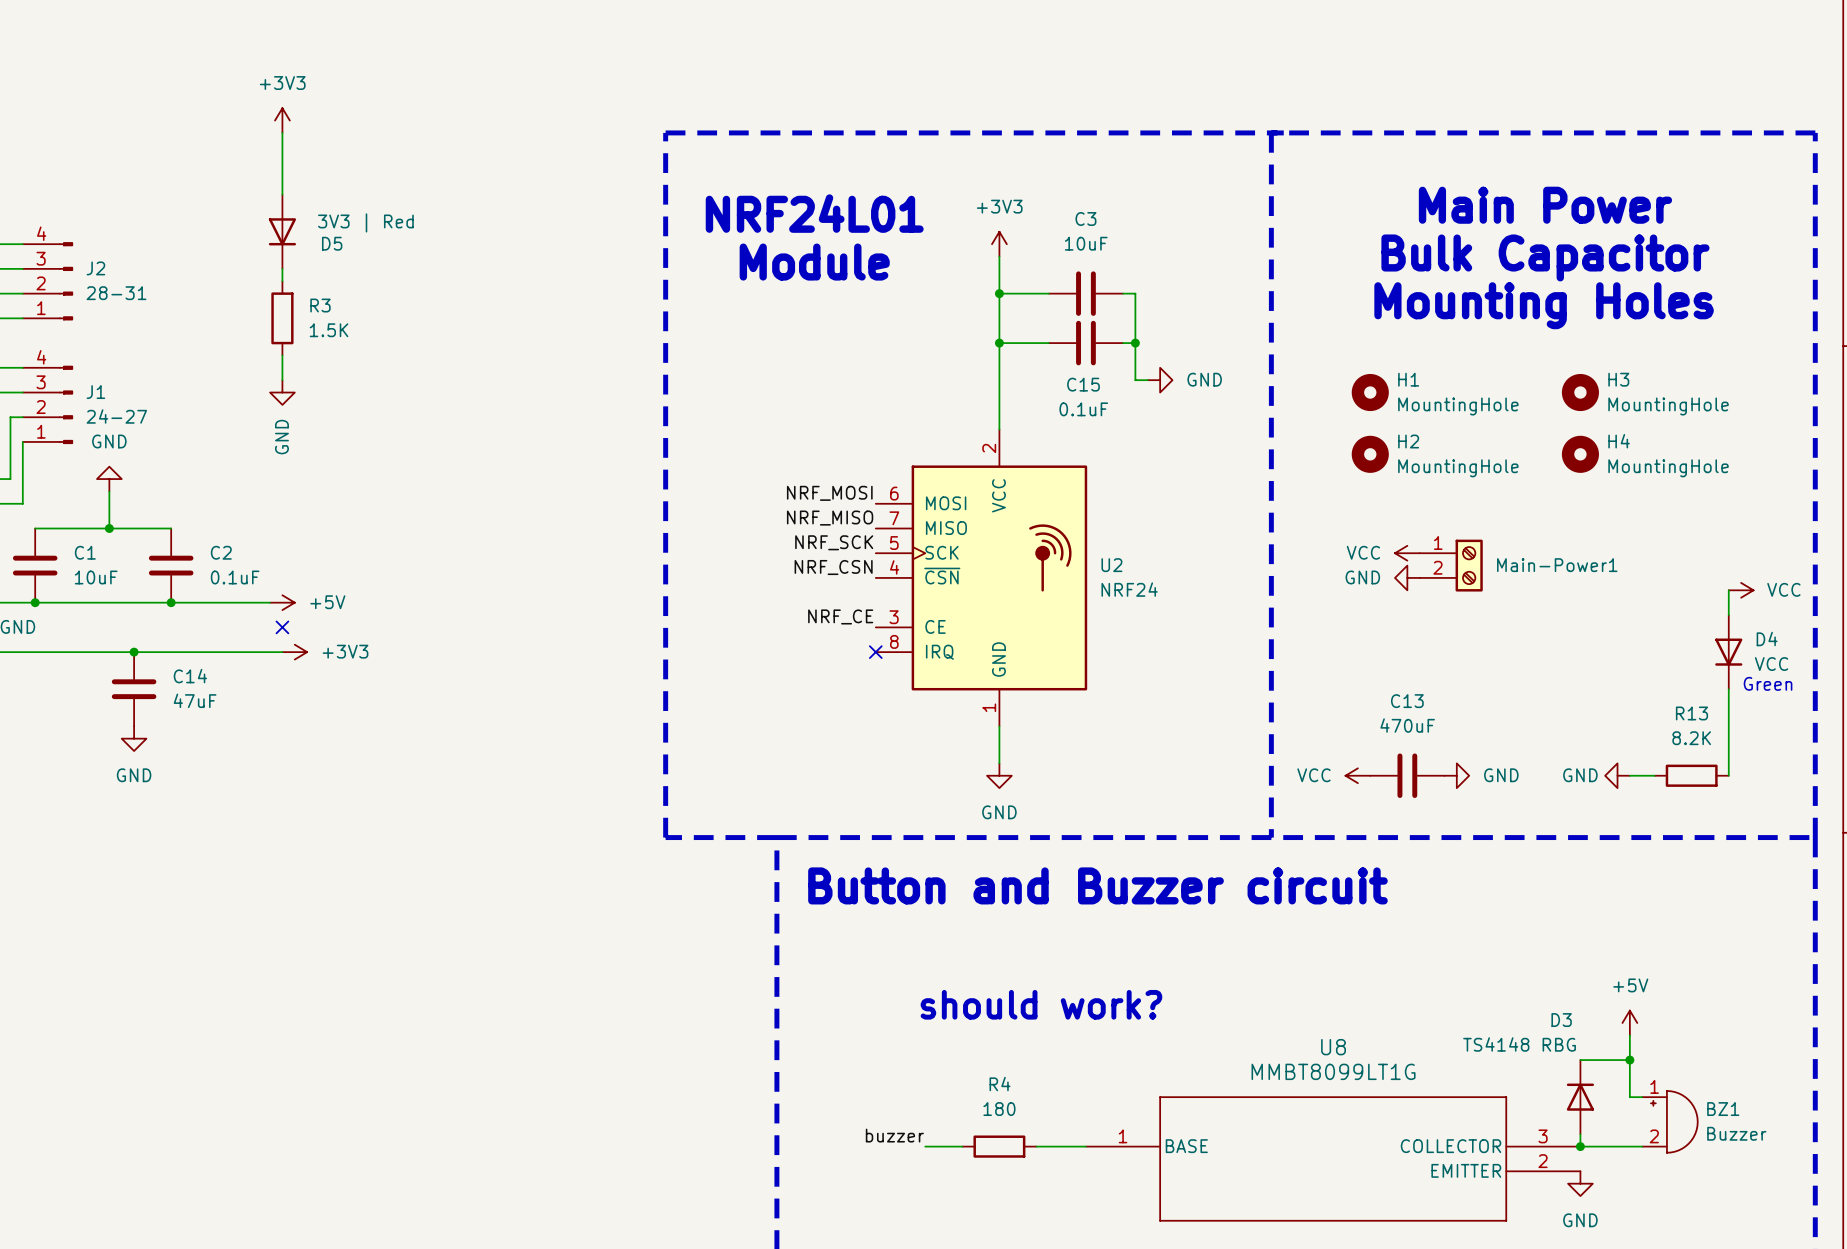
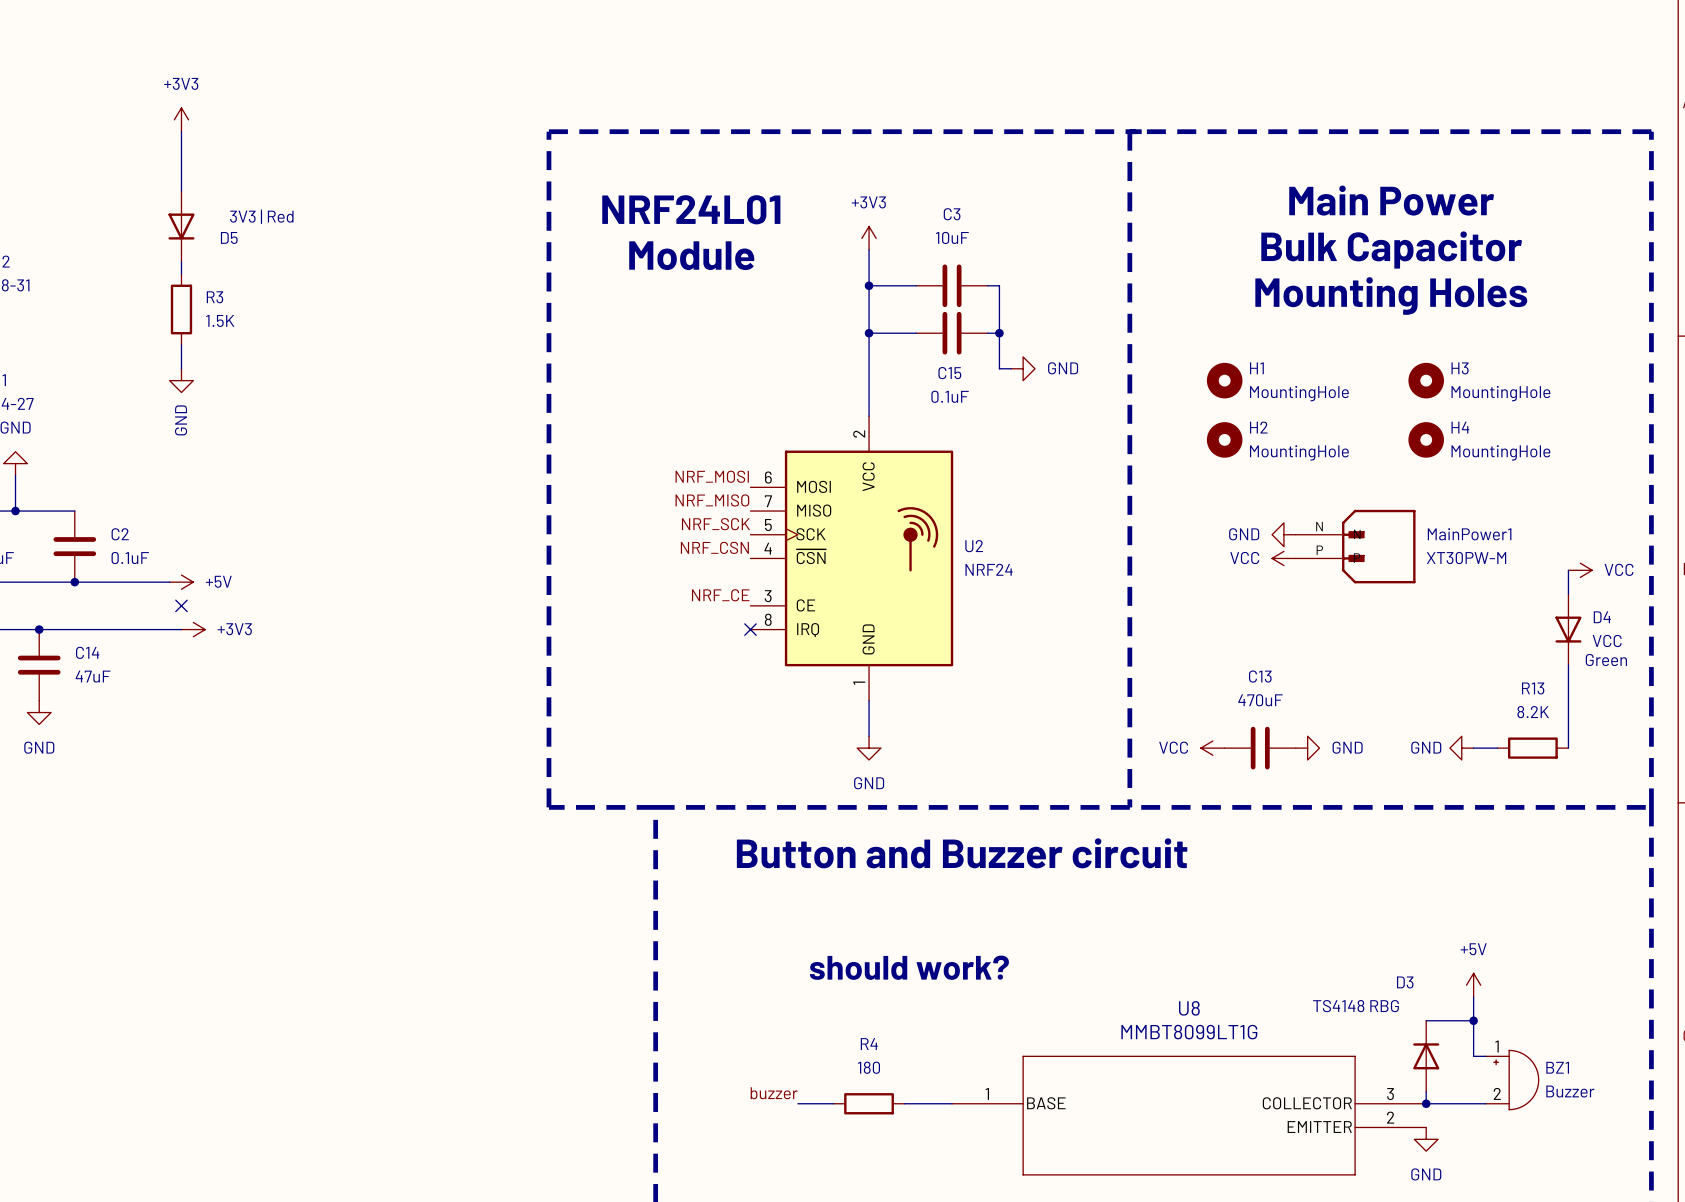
power symbol position: VCC (1407, 553) -> VCC (1283, 558)
Main-Power1: (1451, 565) -> none
MainPower1: none -> XT30PW-M (1355, 546)
power symbol position: GND (1407, 577) -> GND (1283, 534)

